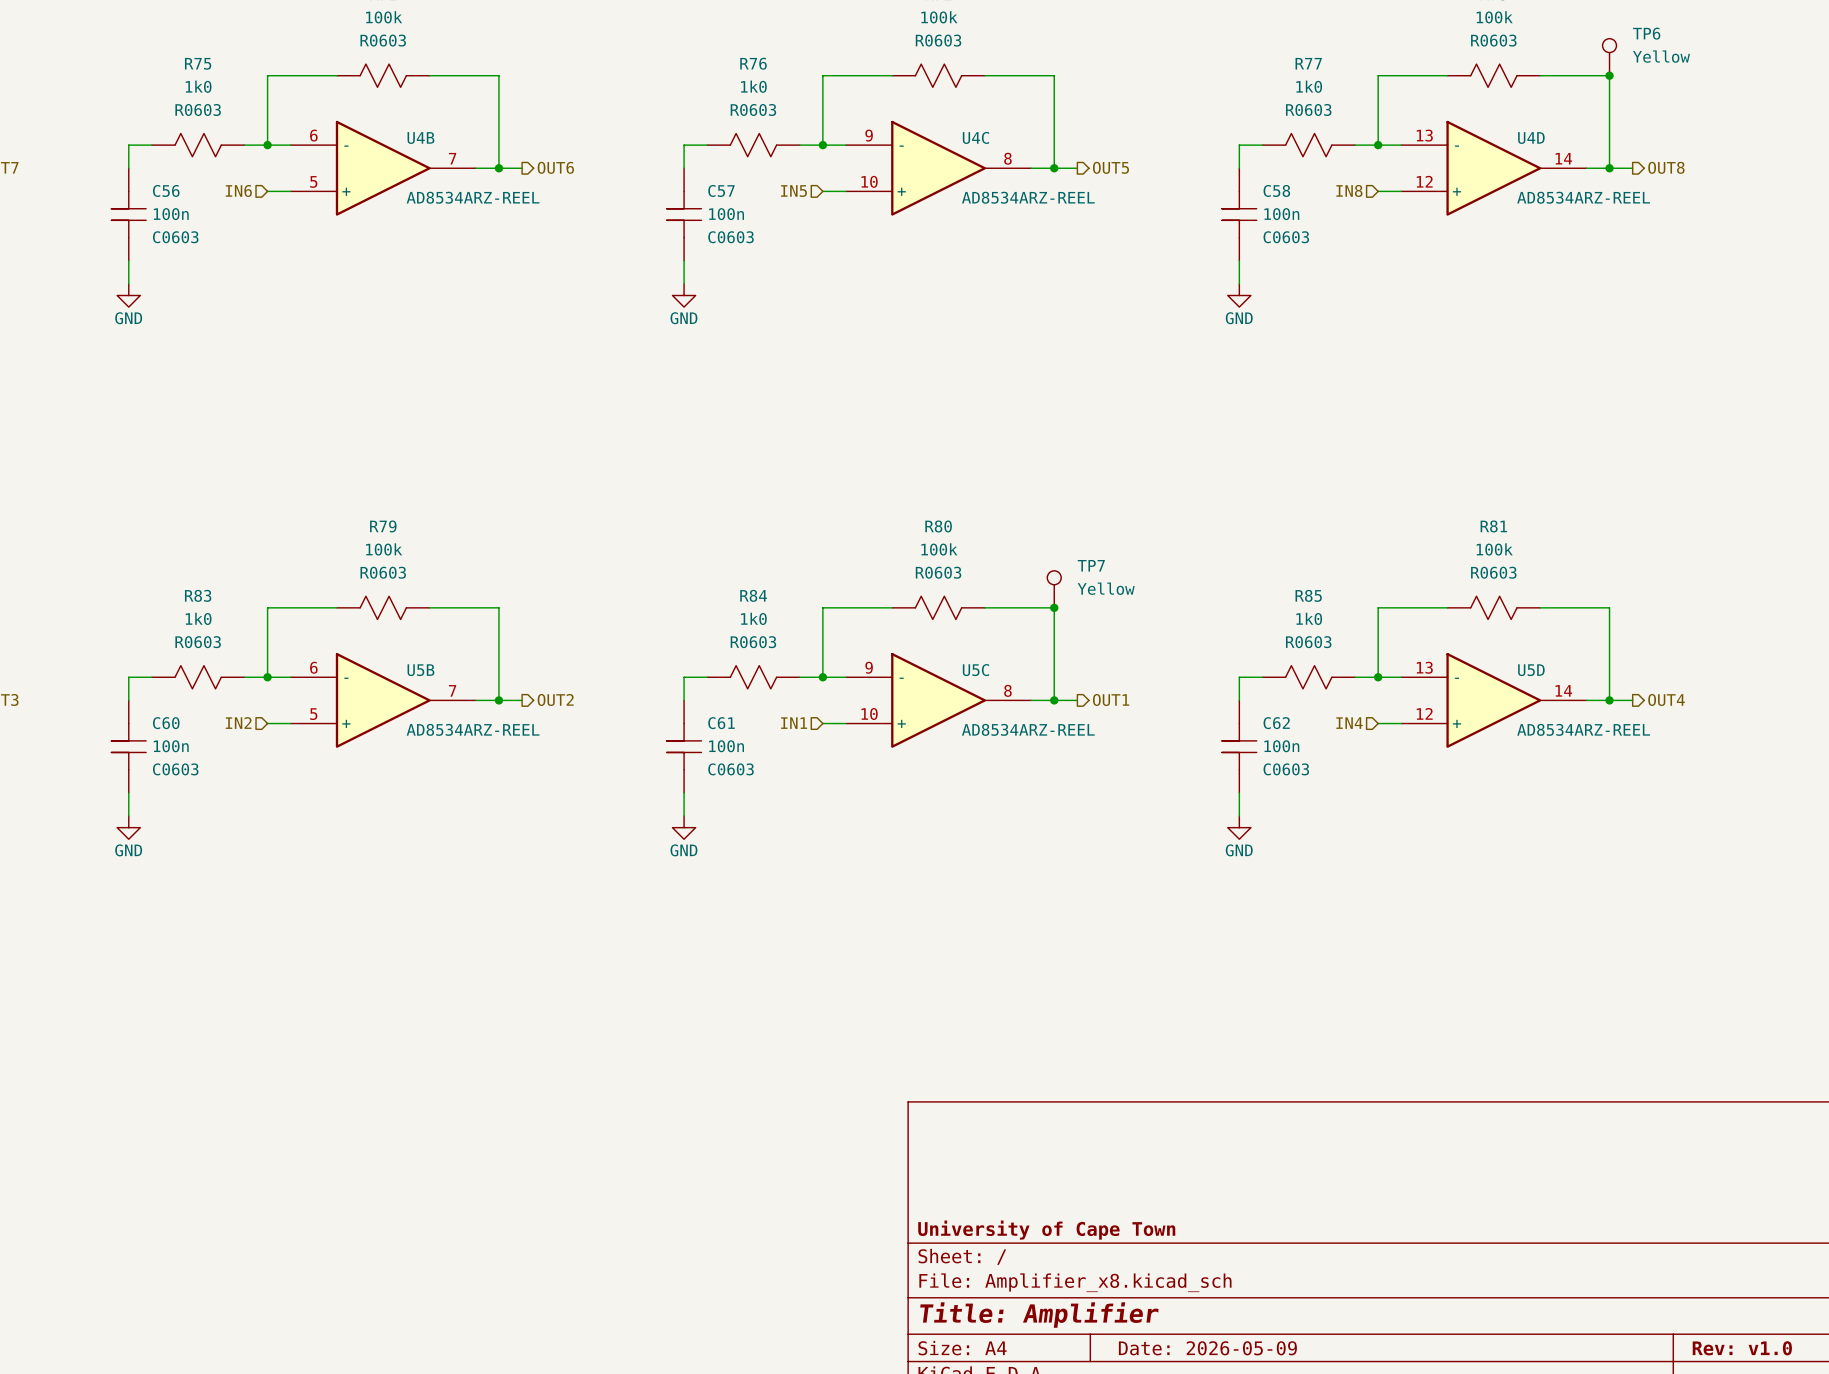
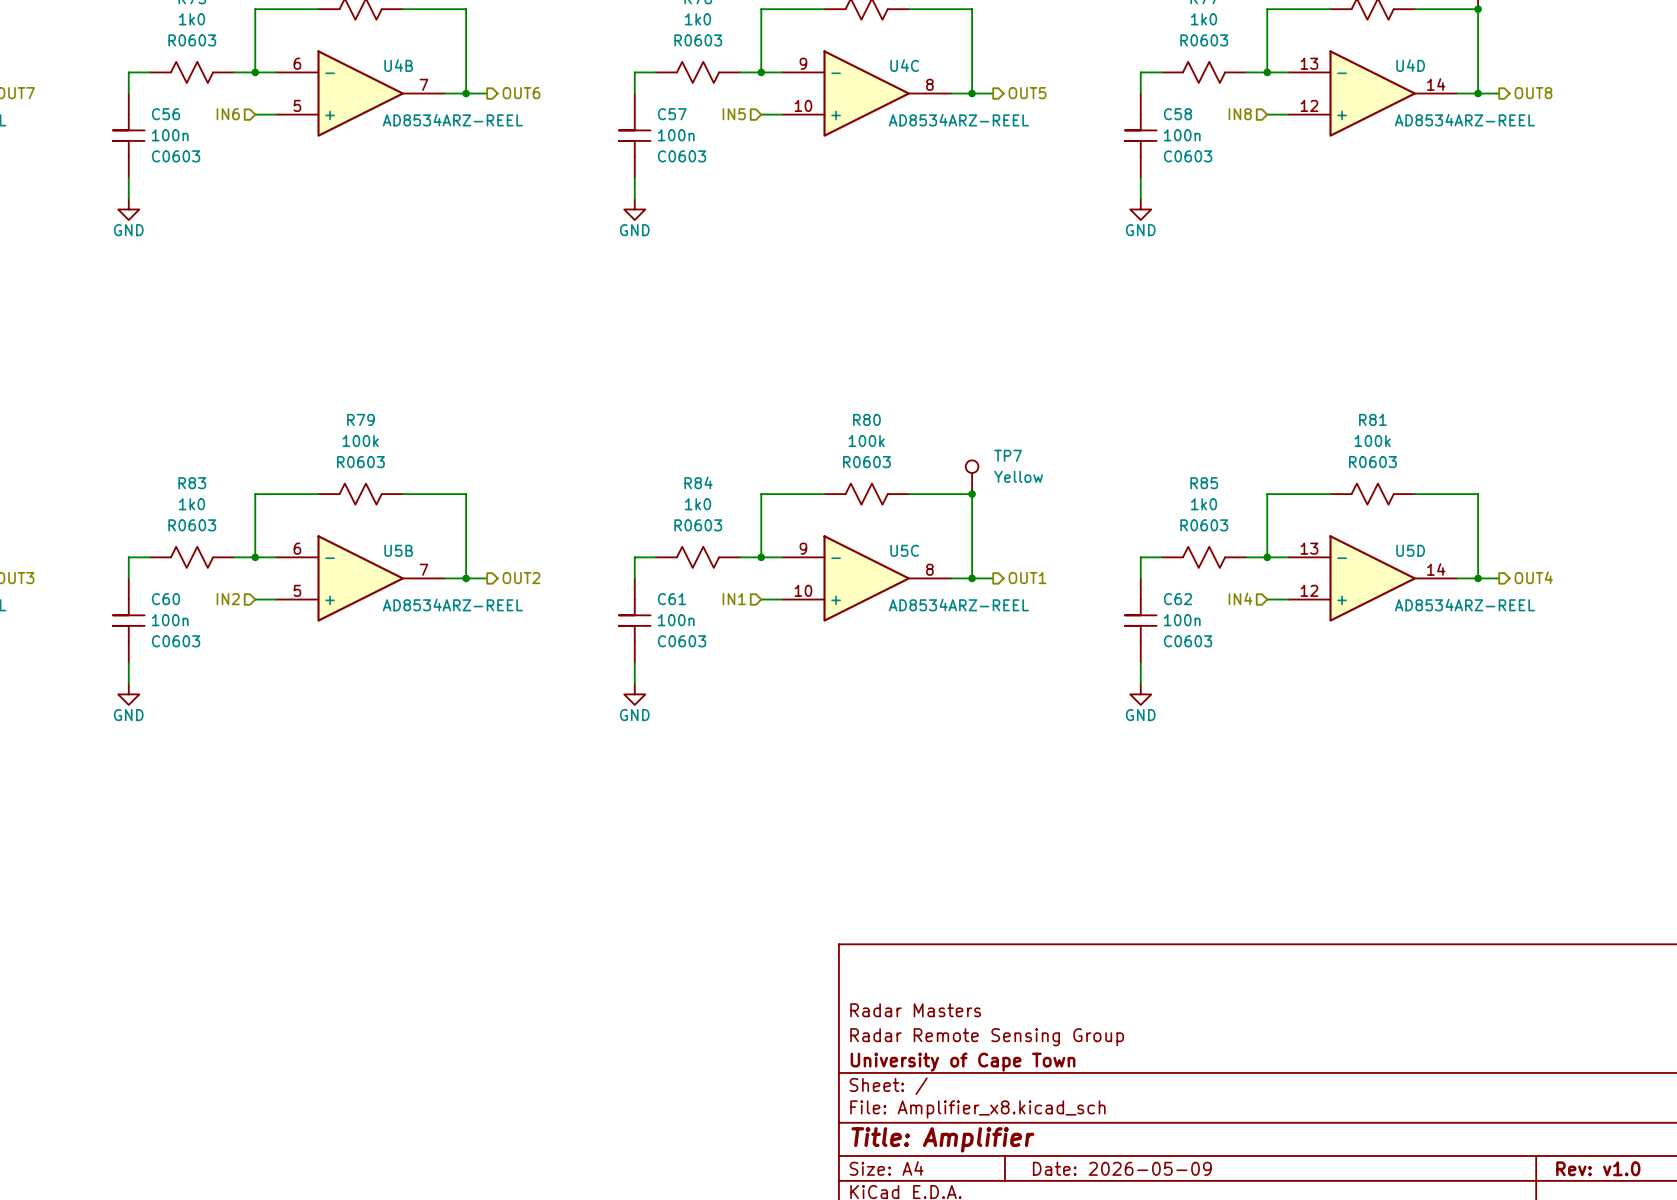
title block: none -> Radar Masters (915, 1010)
title block: none -> Radar Remote Sensing Group (987, 1037)

